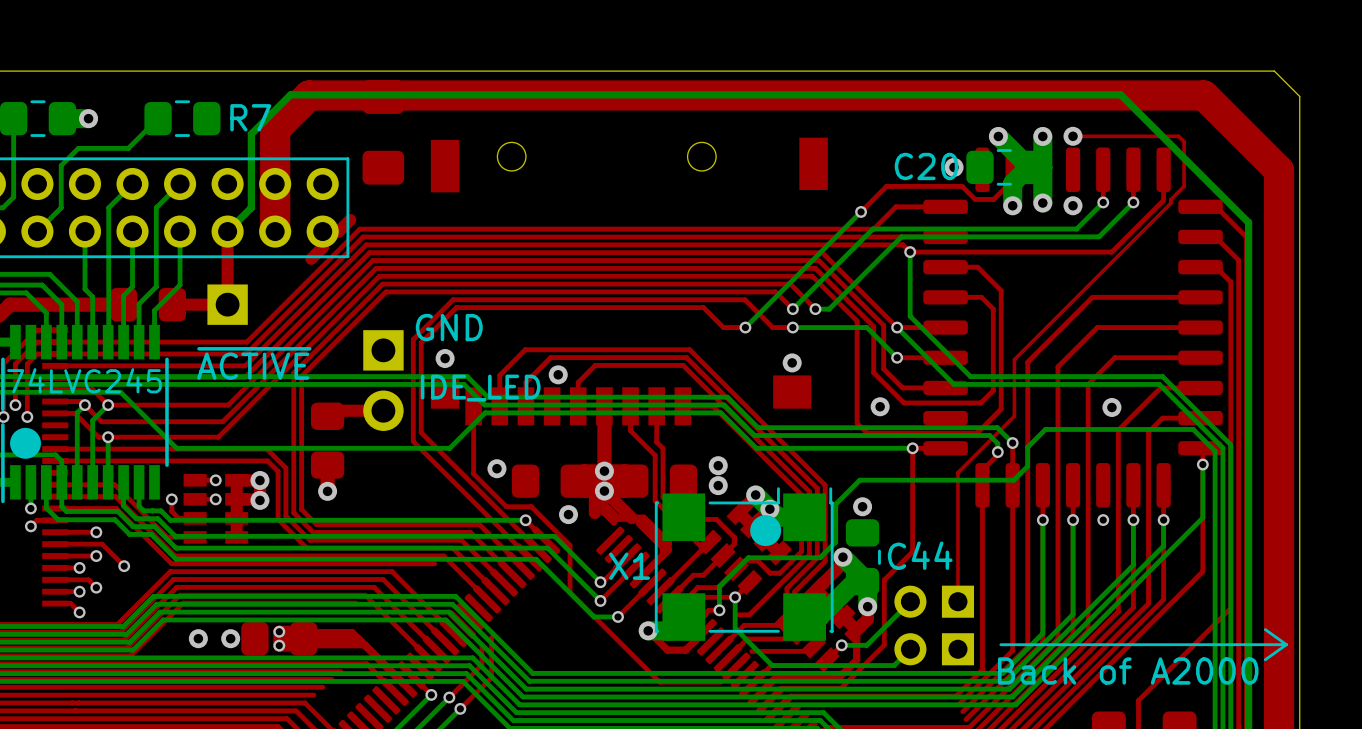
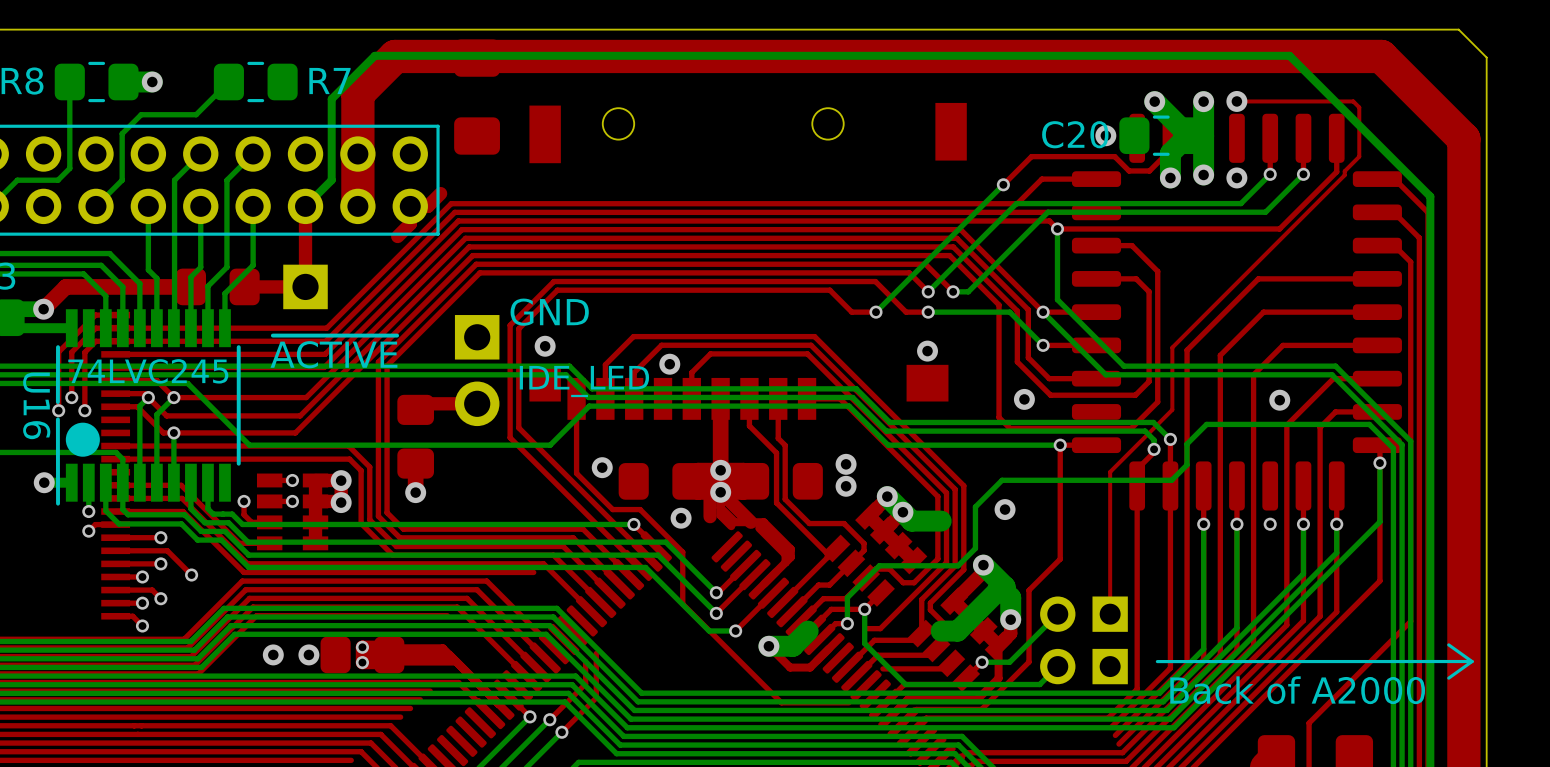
C44: (863, 557) -> none
X1: (744, 564) -> none

